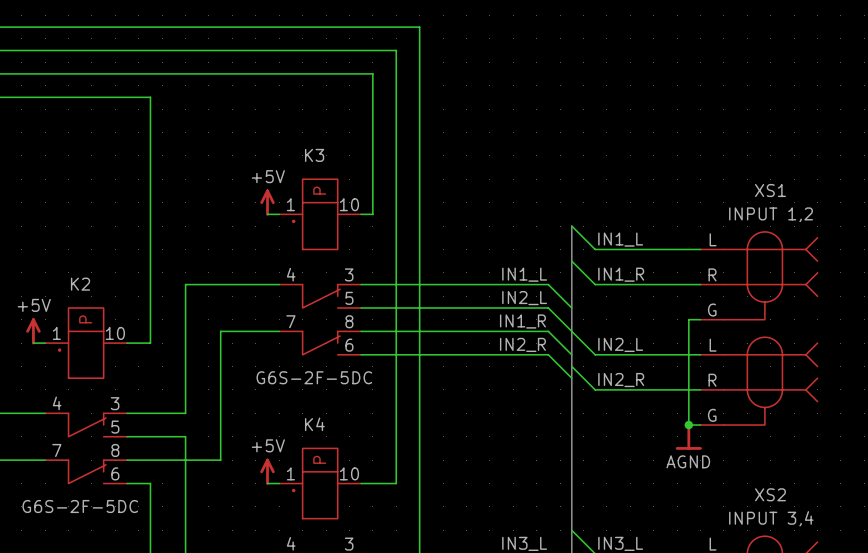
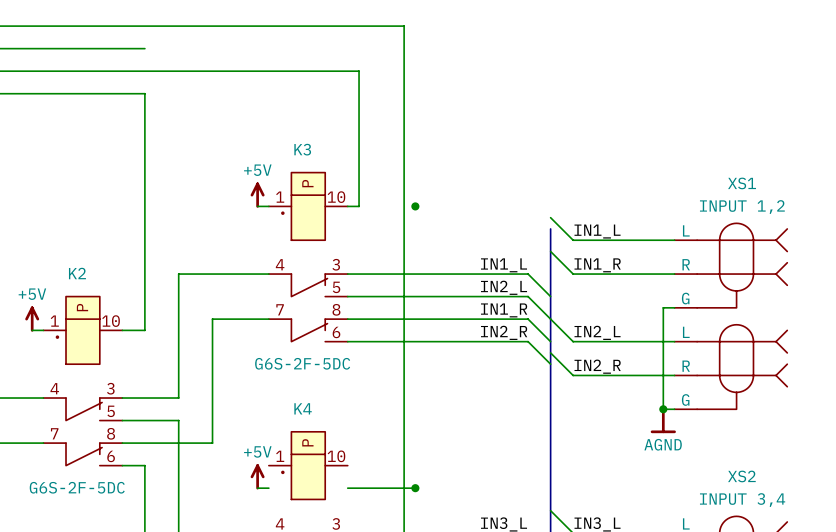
wire: (150, 50) (396, 50) (396, 483) (361, 483) -> none
junction: none -> (415, 206)
bus: (571, 226) (571, 237) -> none
power symbol position: +5V (267, 471) -> +5V (257, 476)
wire: (267, 483) (279, 483) -> (257, 488) (268, 488)
wire: none -> (347, 488) (415, 488)
junction: none -> (415, 488)

